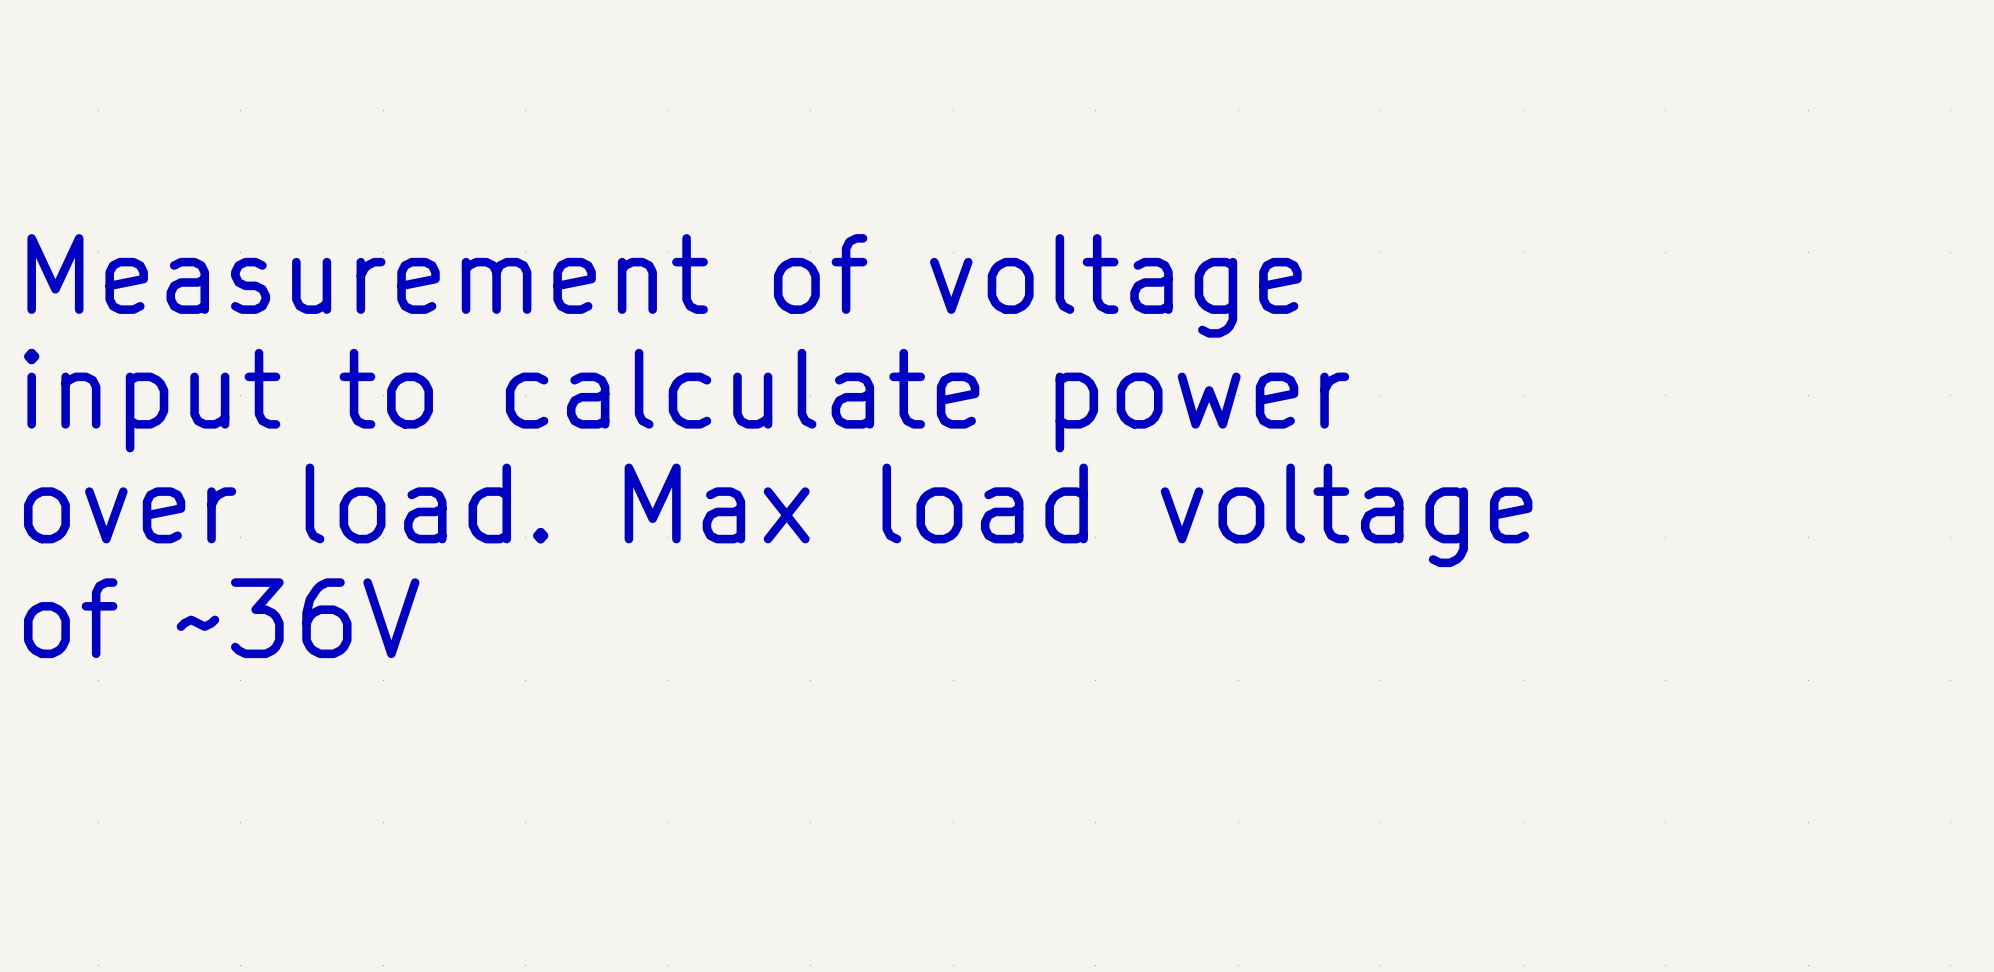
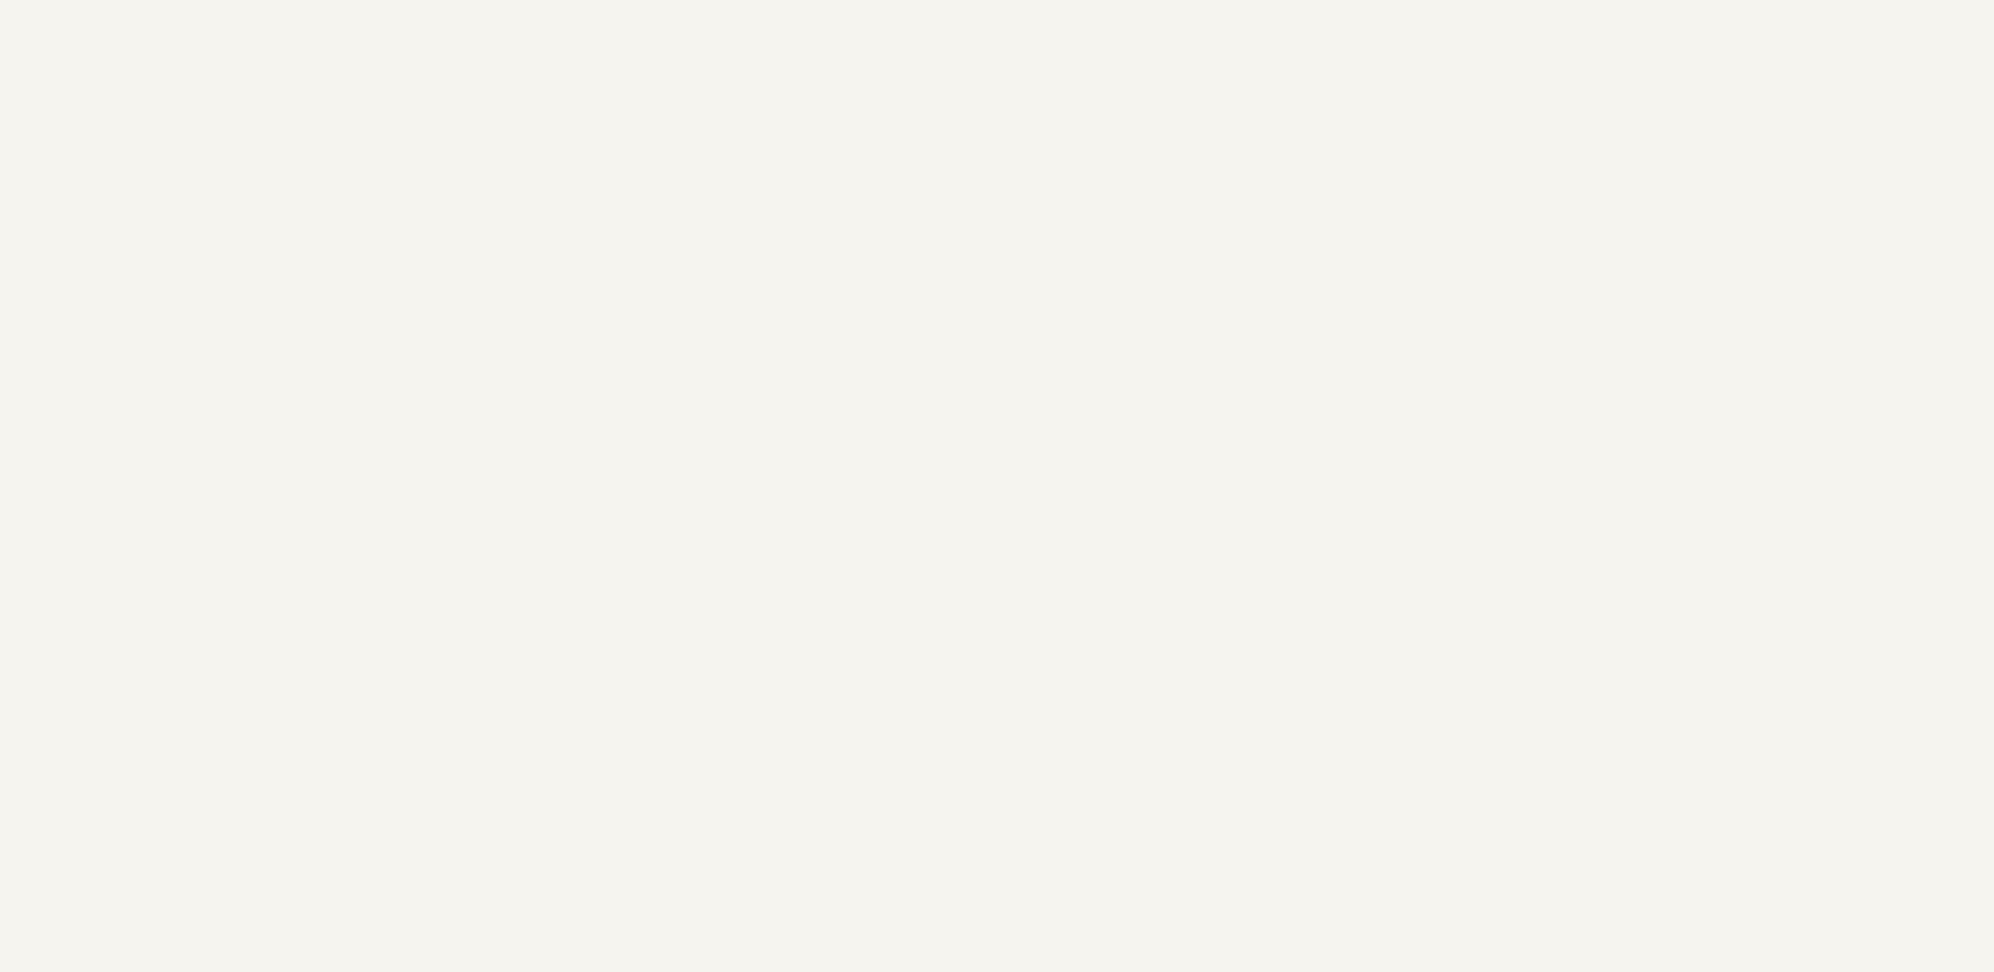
text: Measurement of voltage (664, 285) -> none
text: input to calculate power (686, 400) -> none
text: over load. Max load voltage (778, 515) -> none
text: of ~36V (221, 618) -> none

